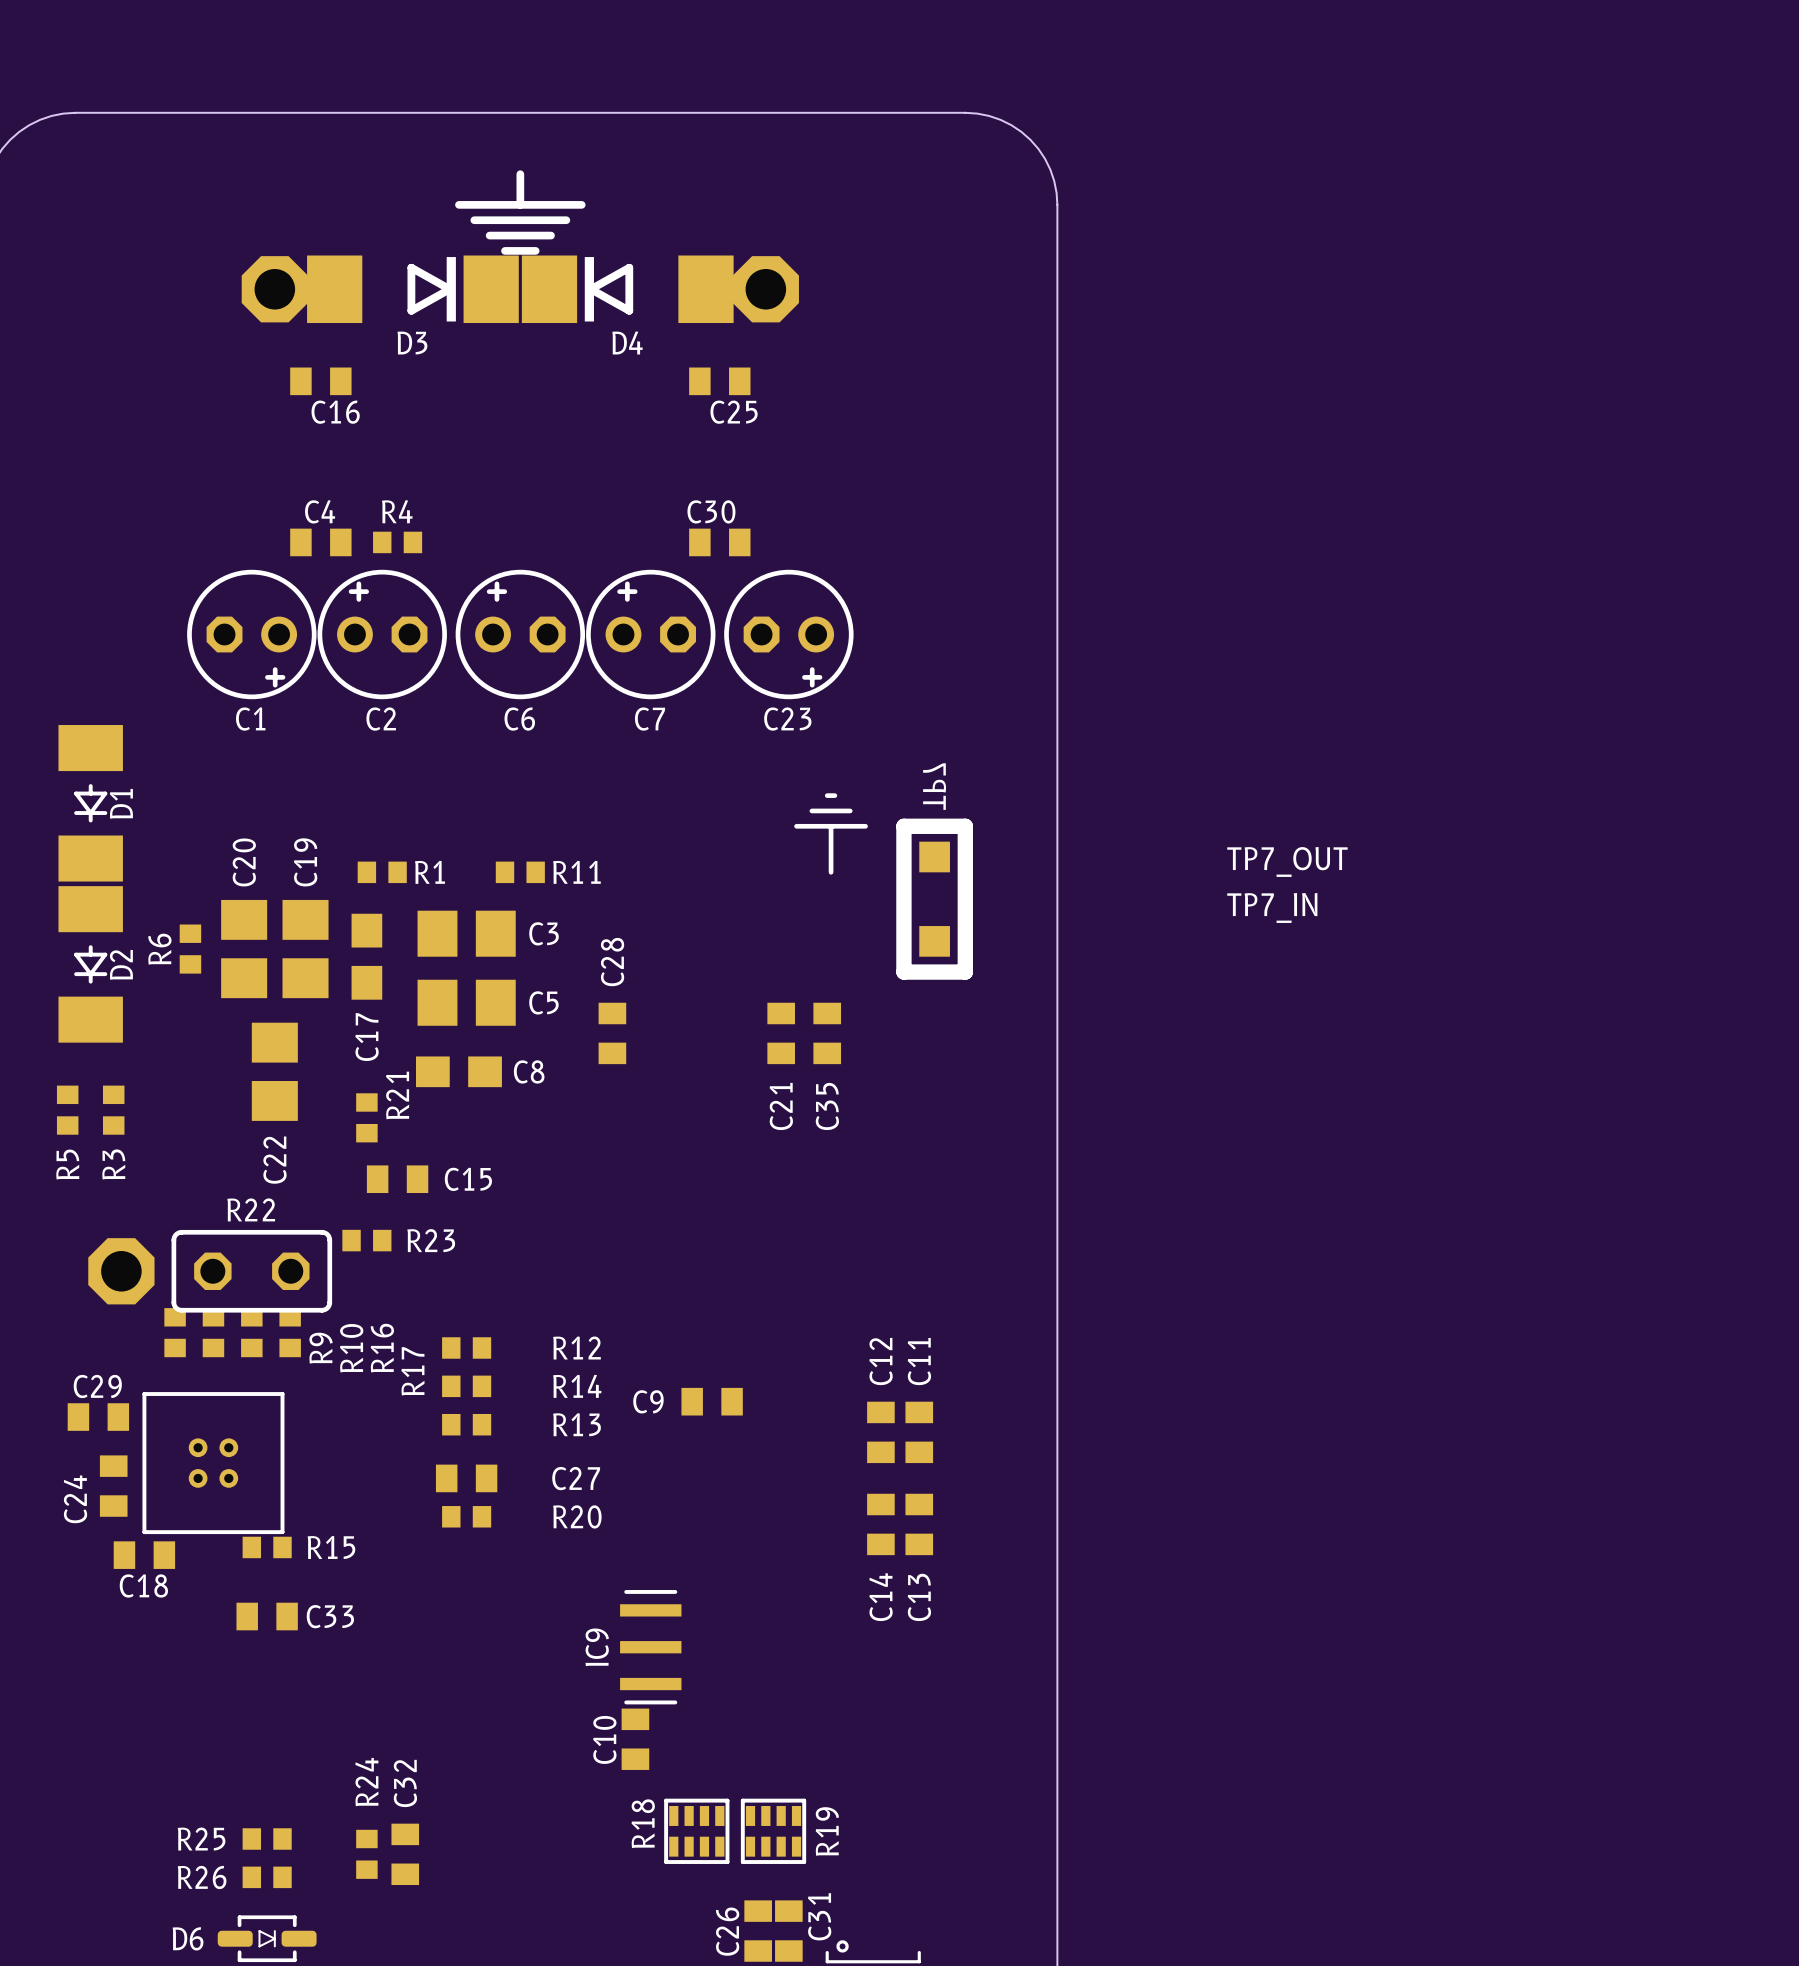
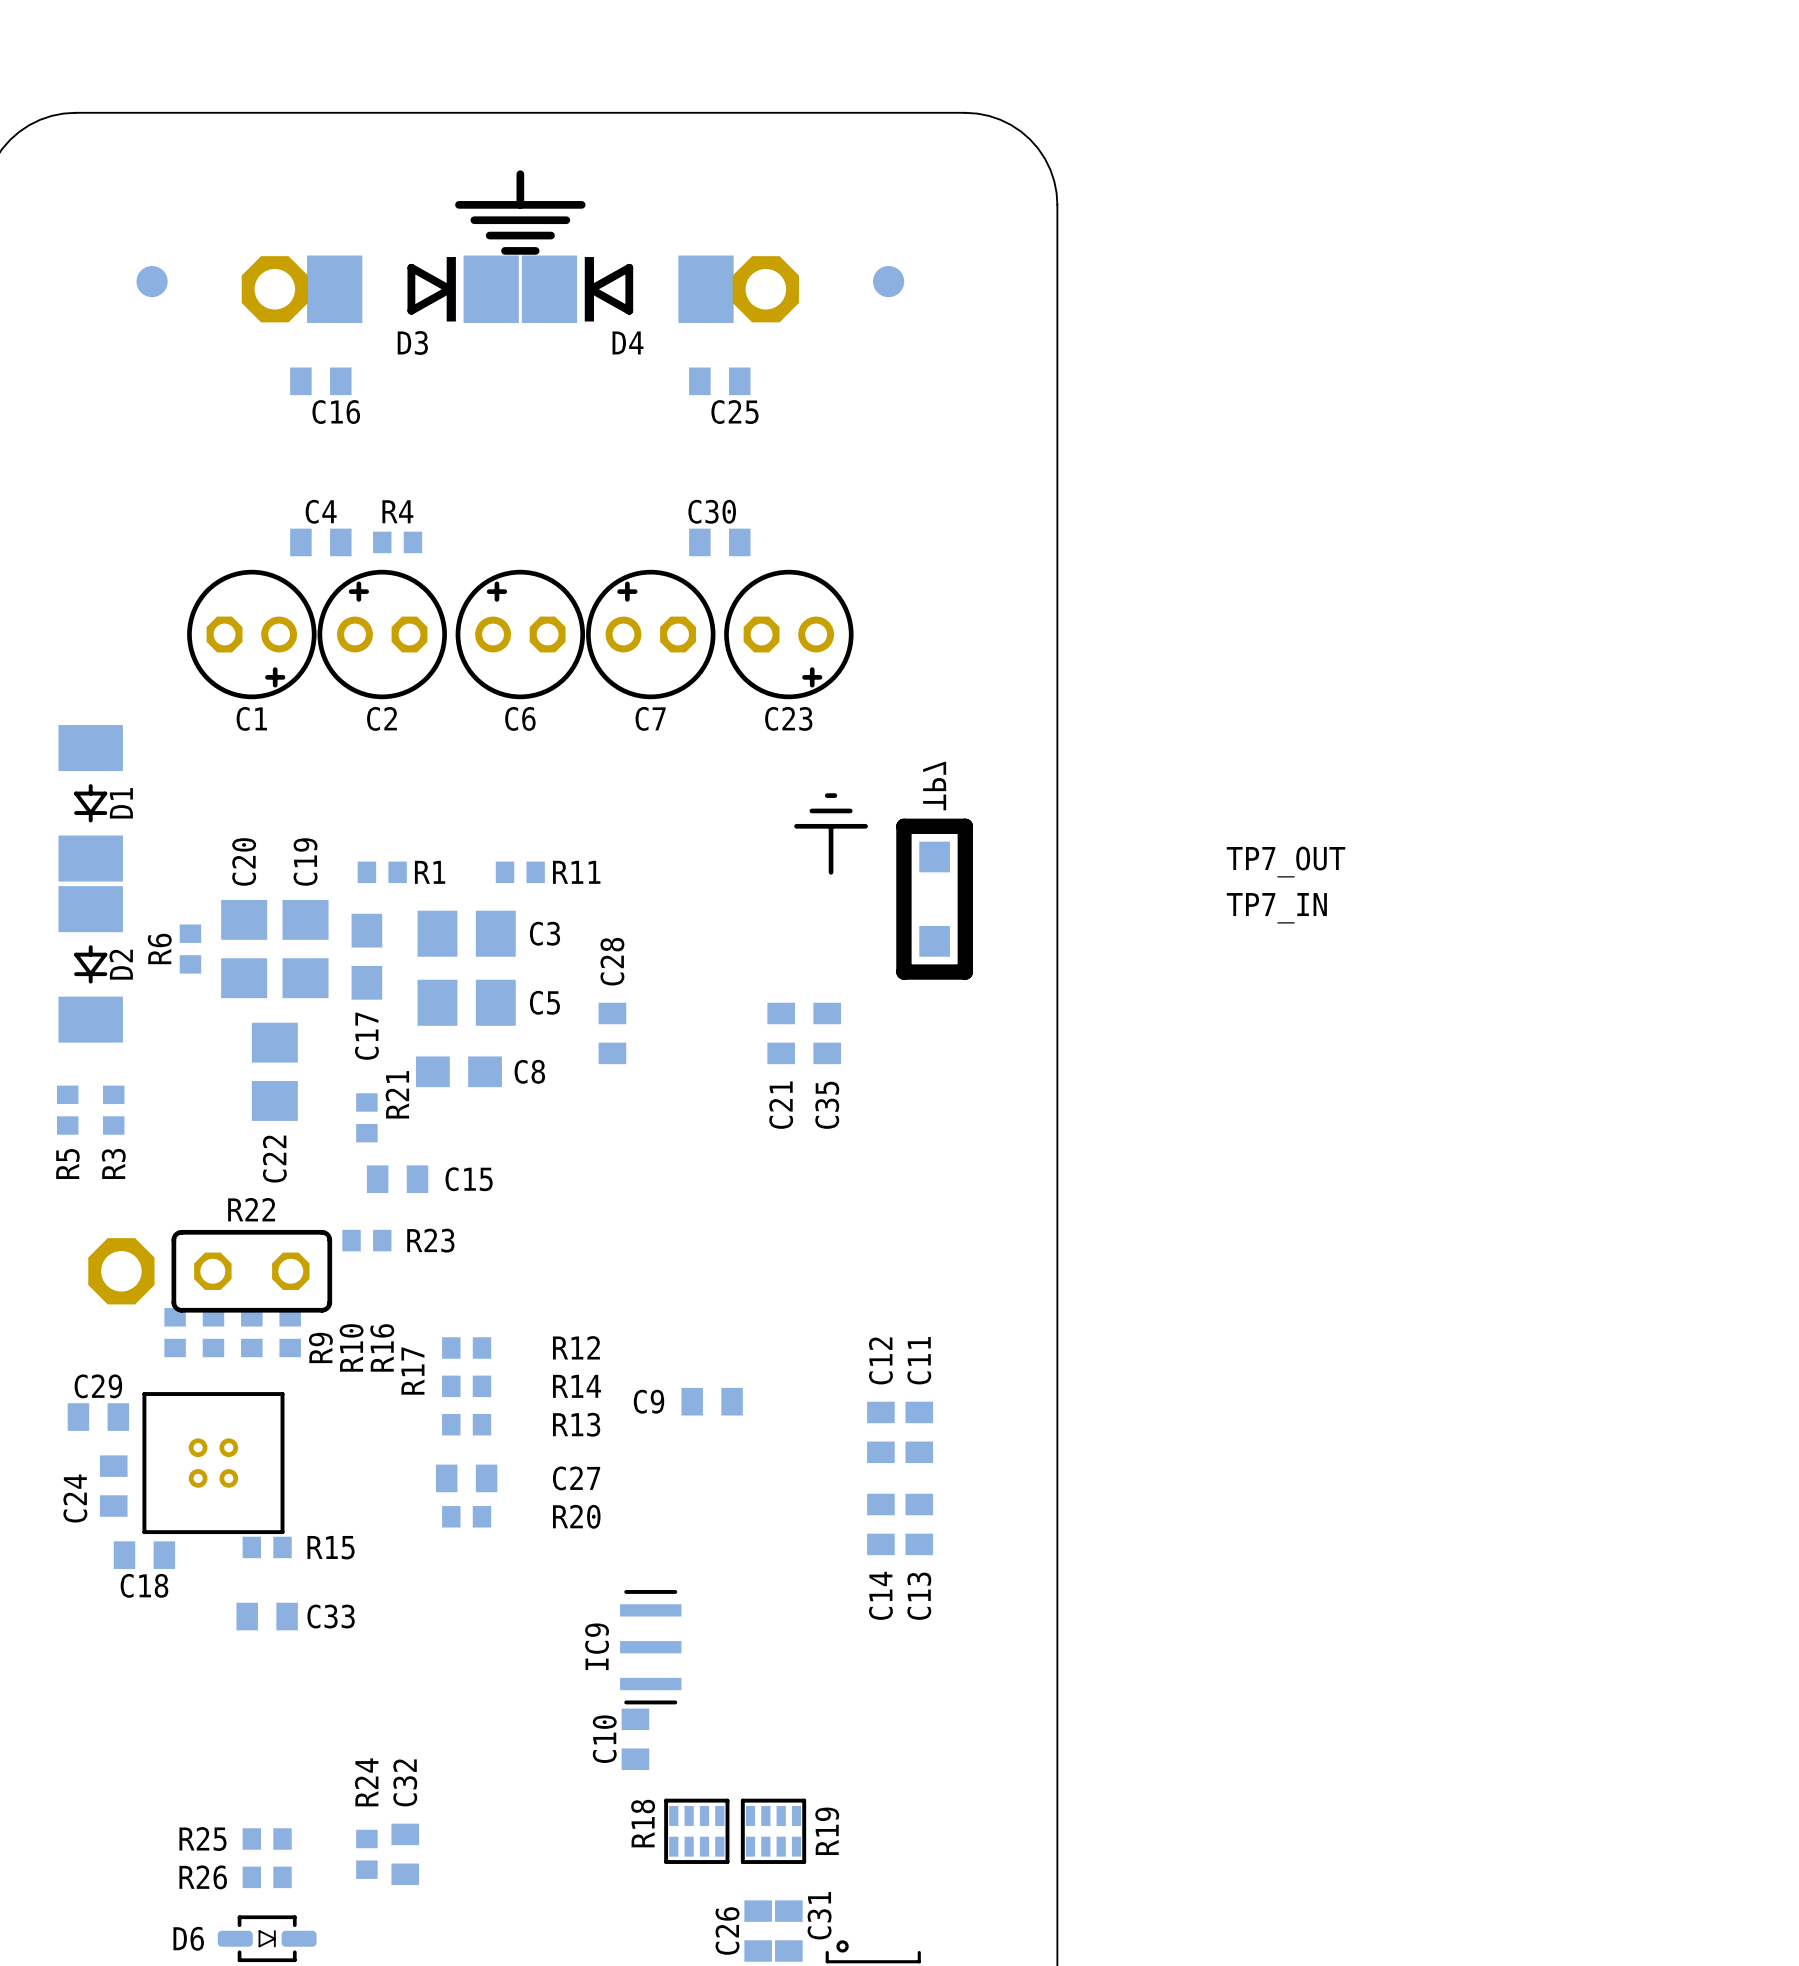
part: none -> (152, 281)
part: none -> (888, 281)

